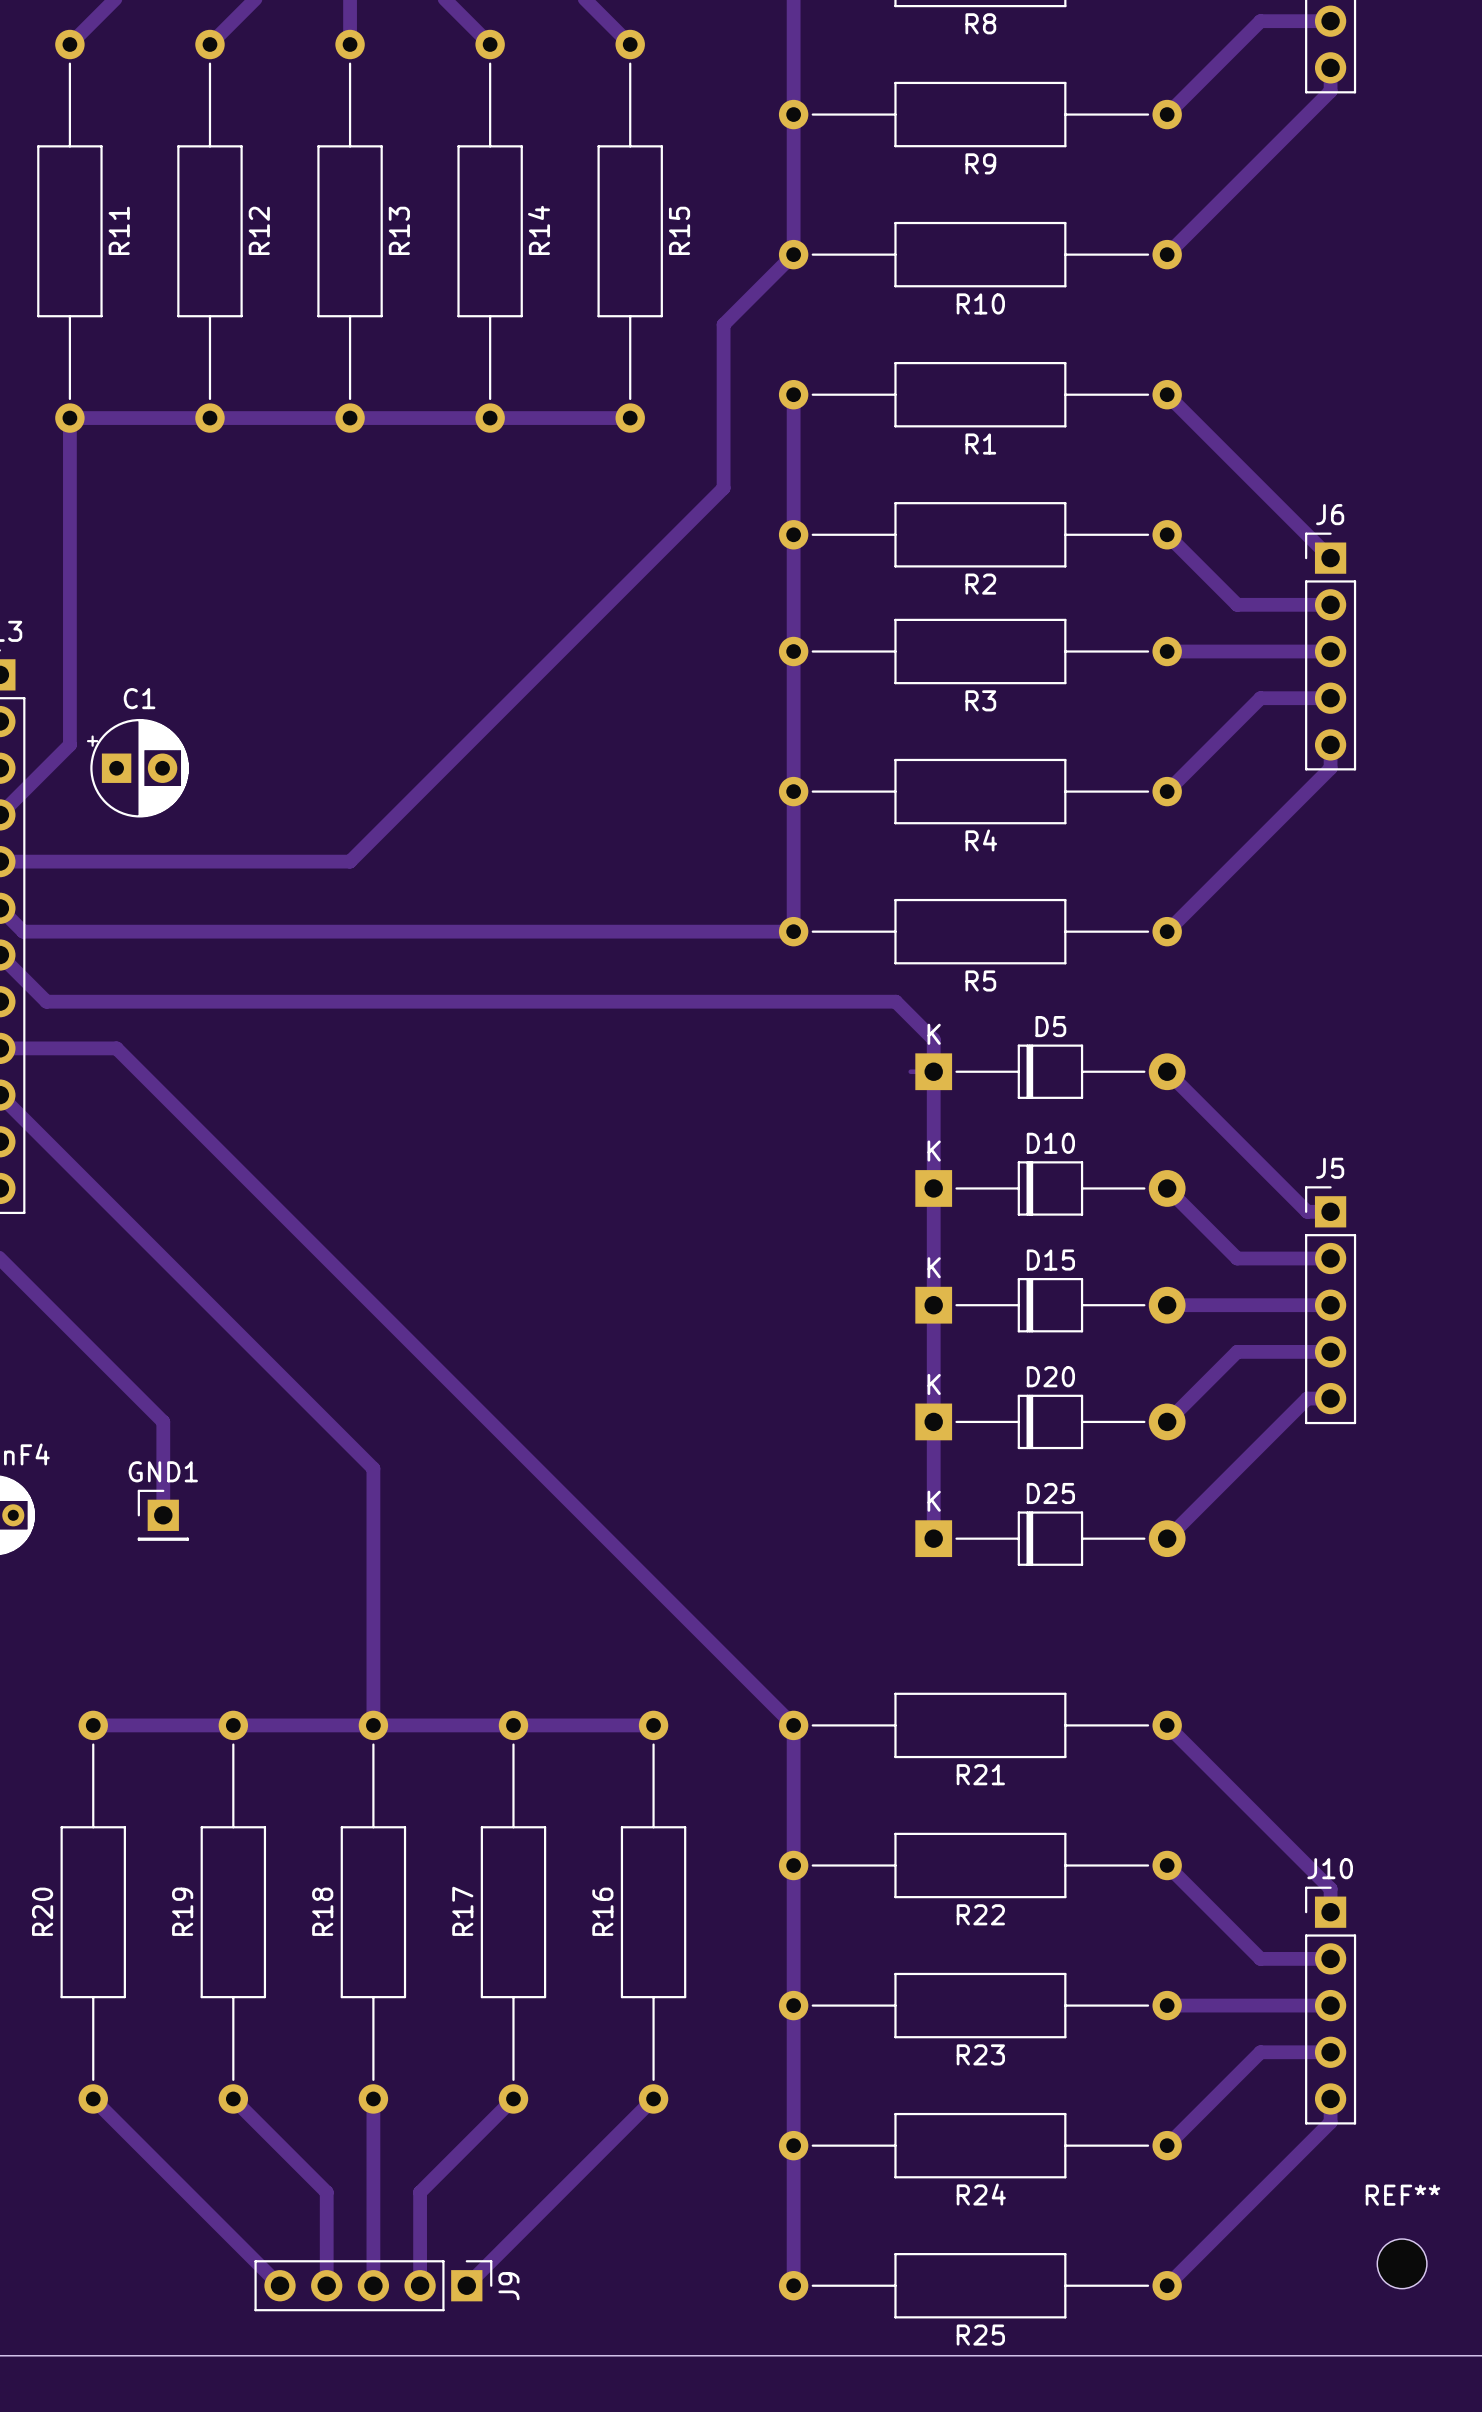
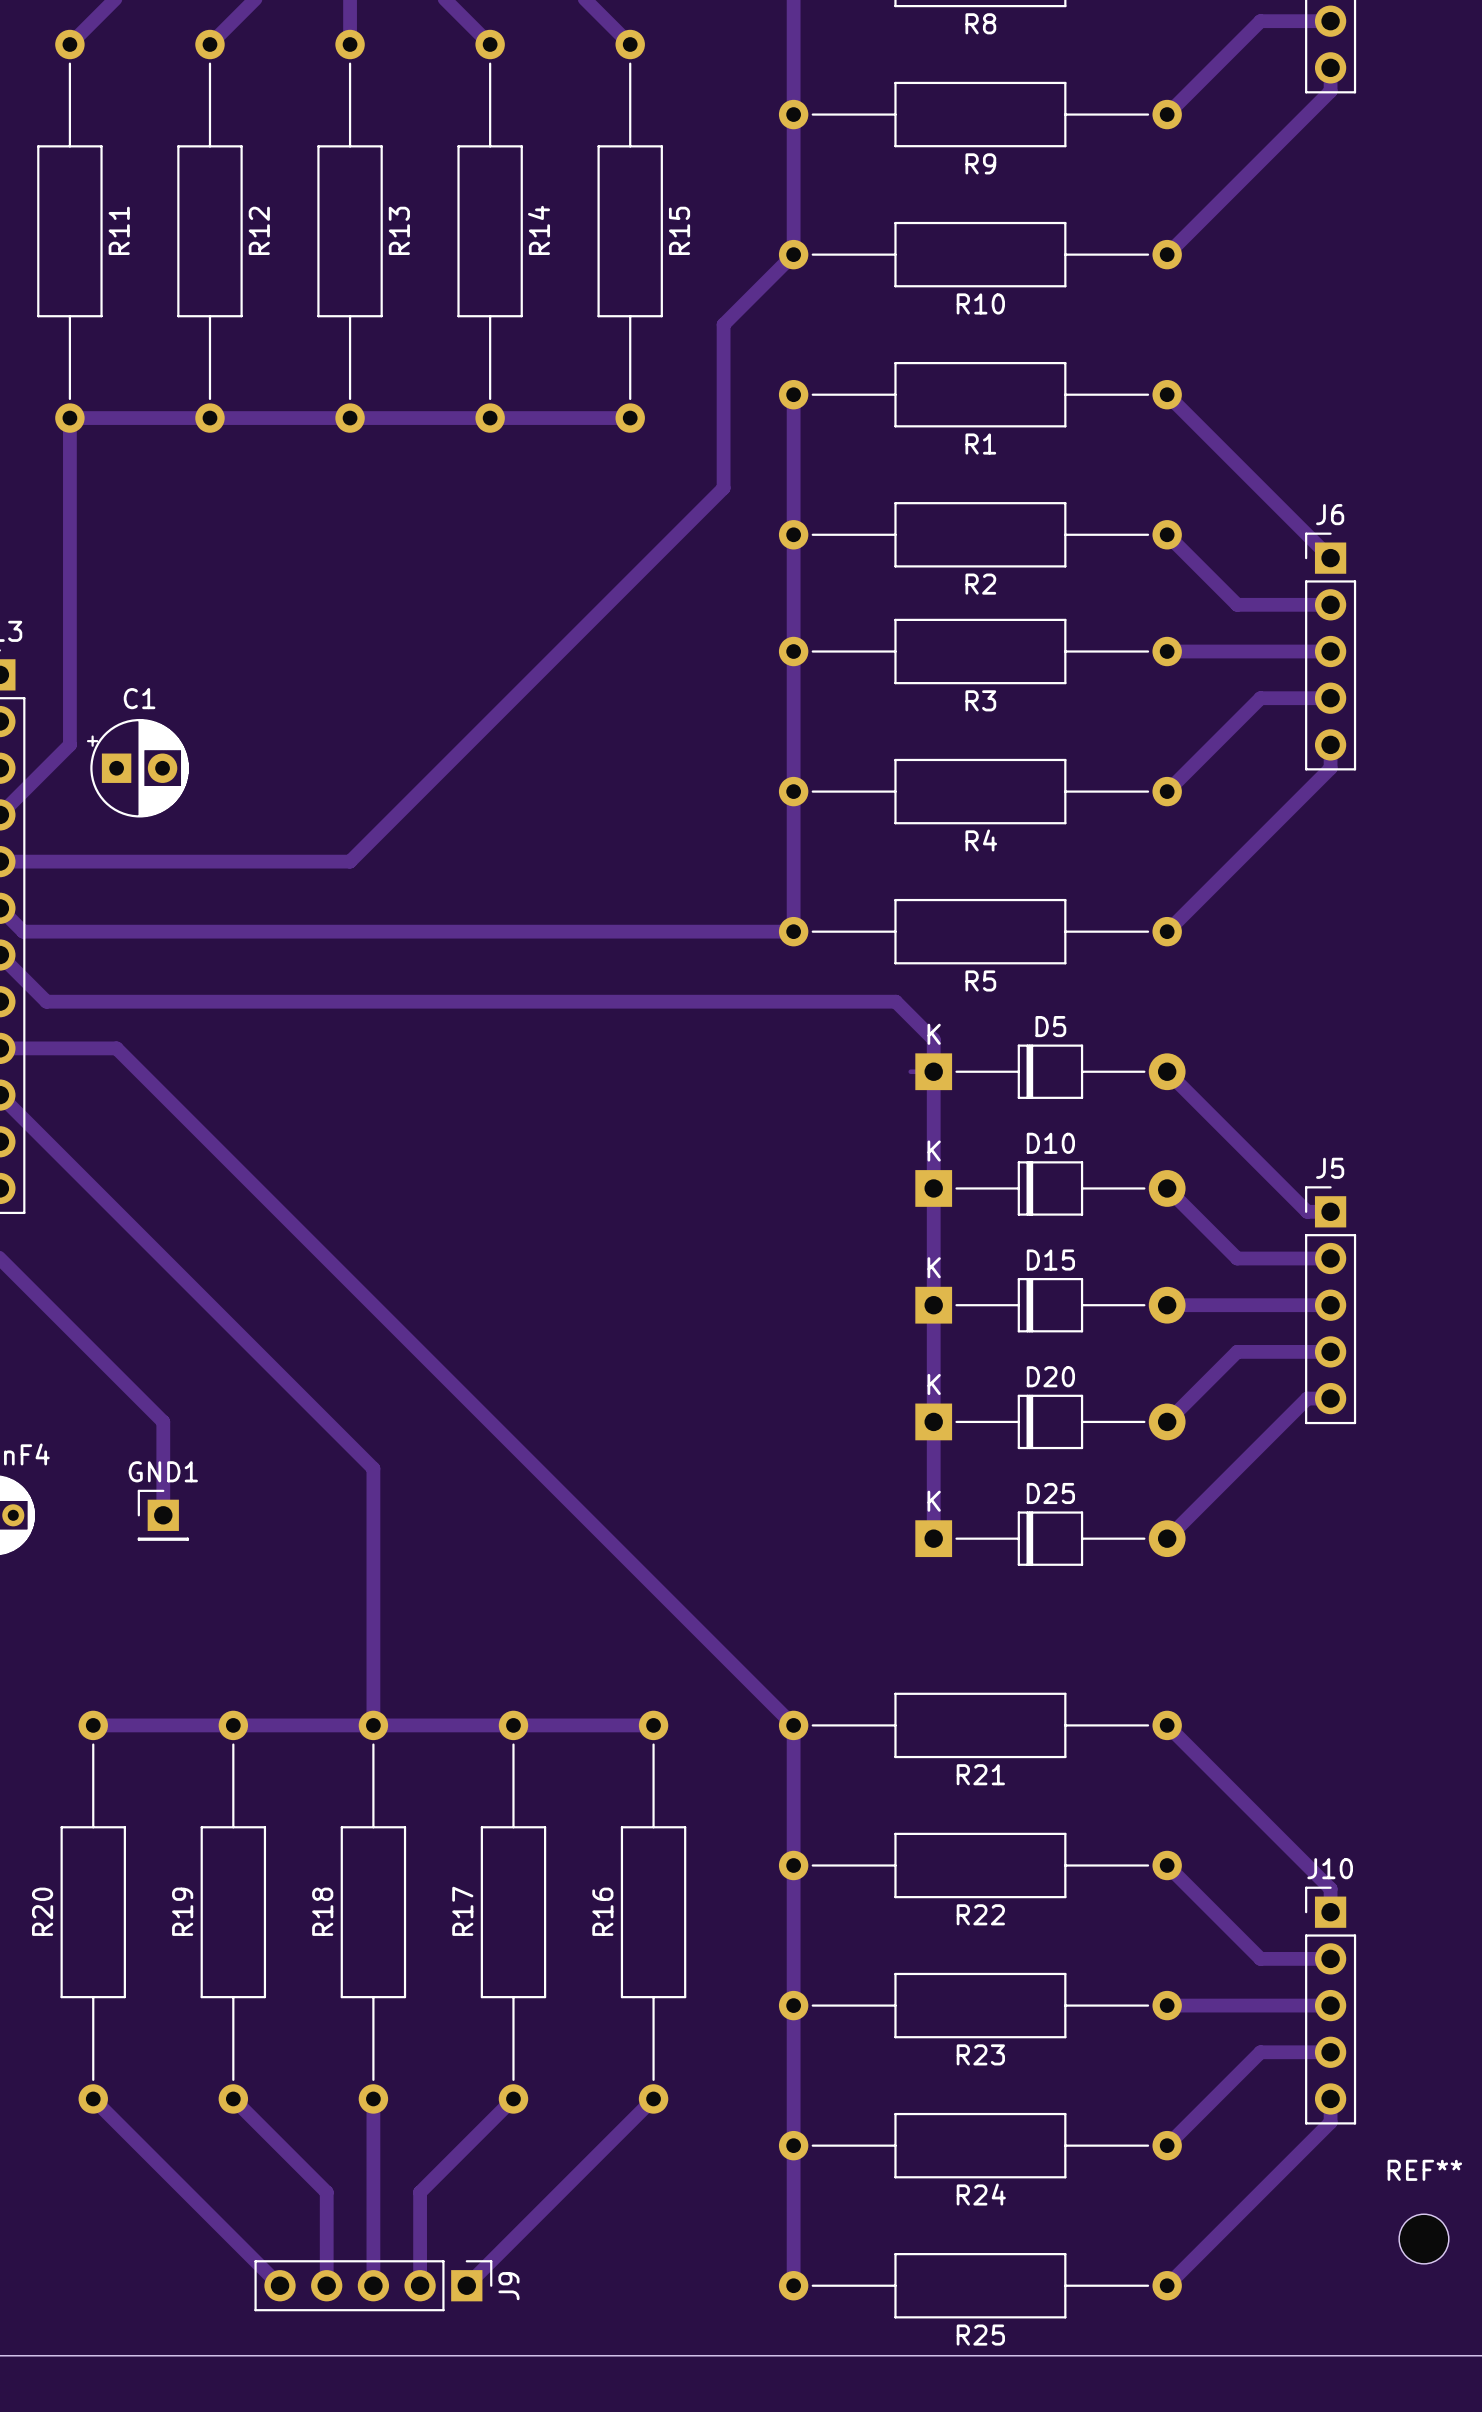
REF** position: (1402, 2263) -> (1423, 2239)

